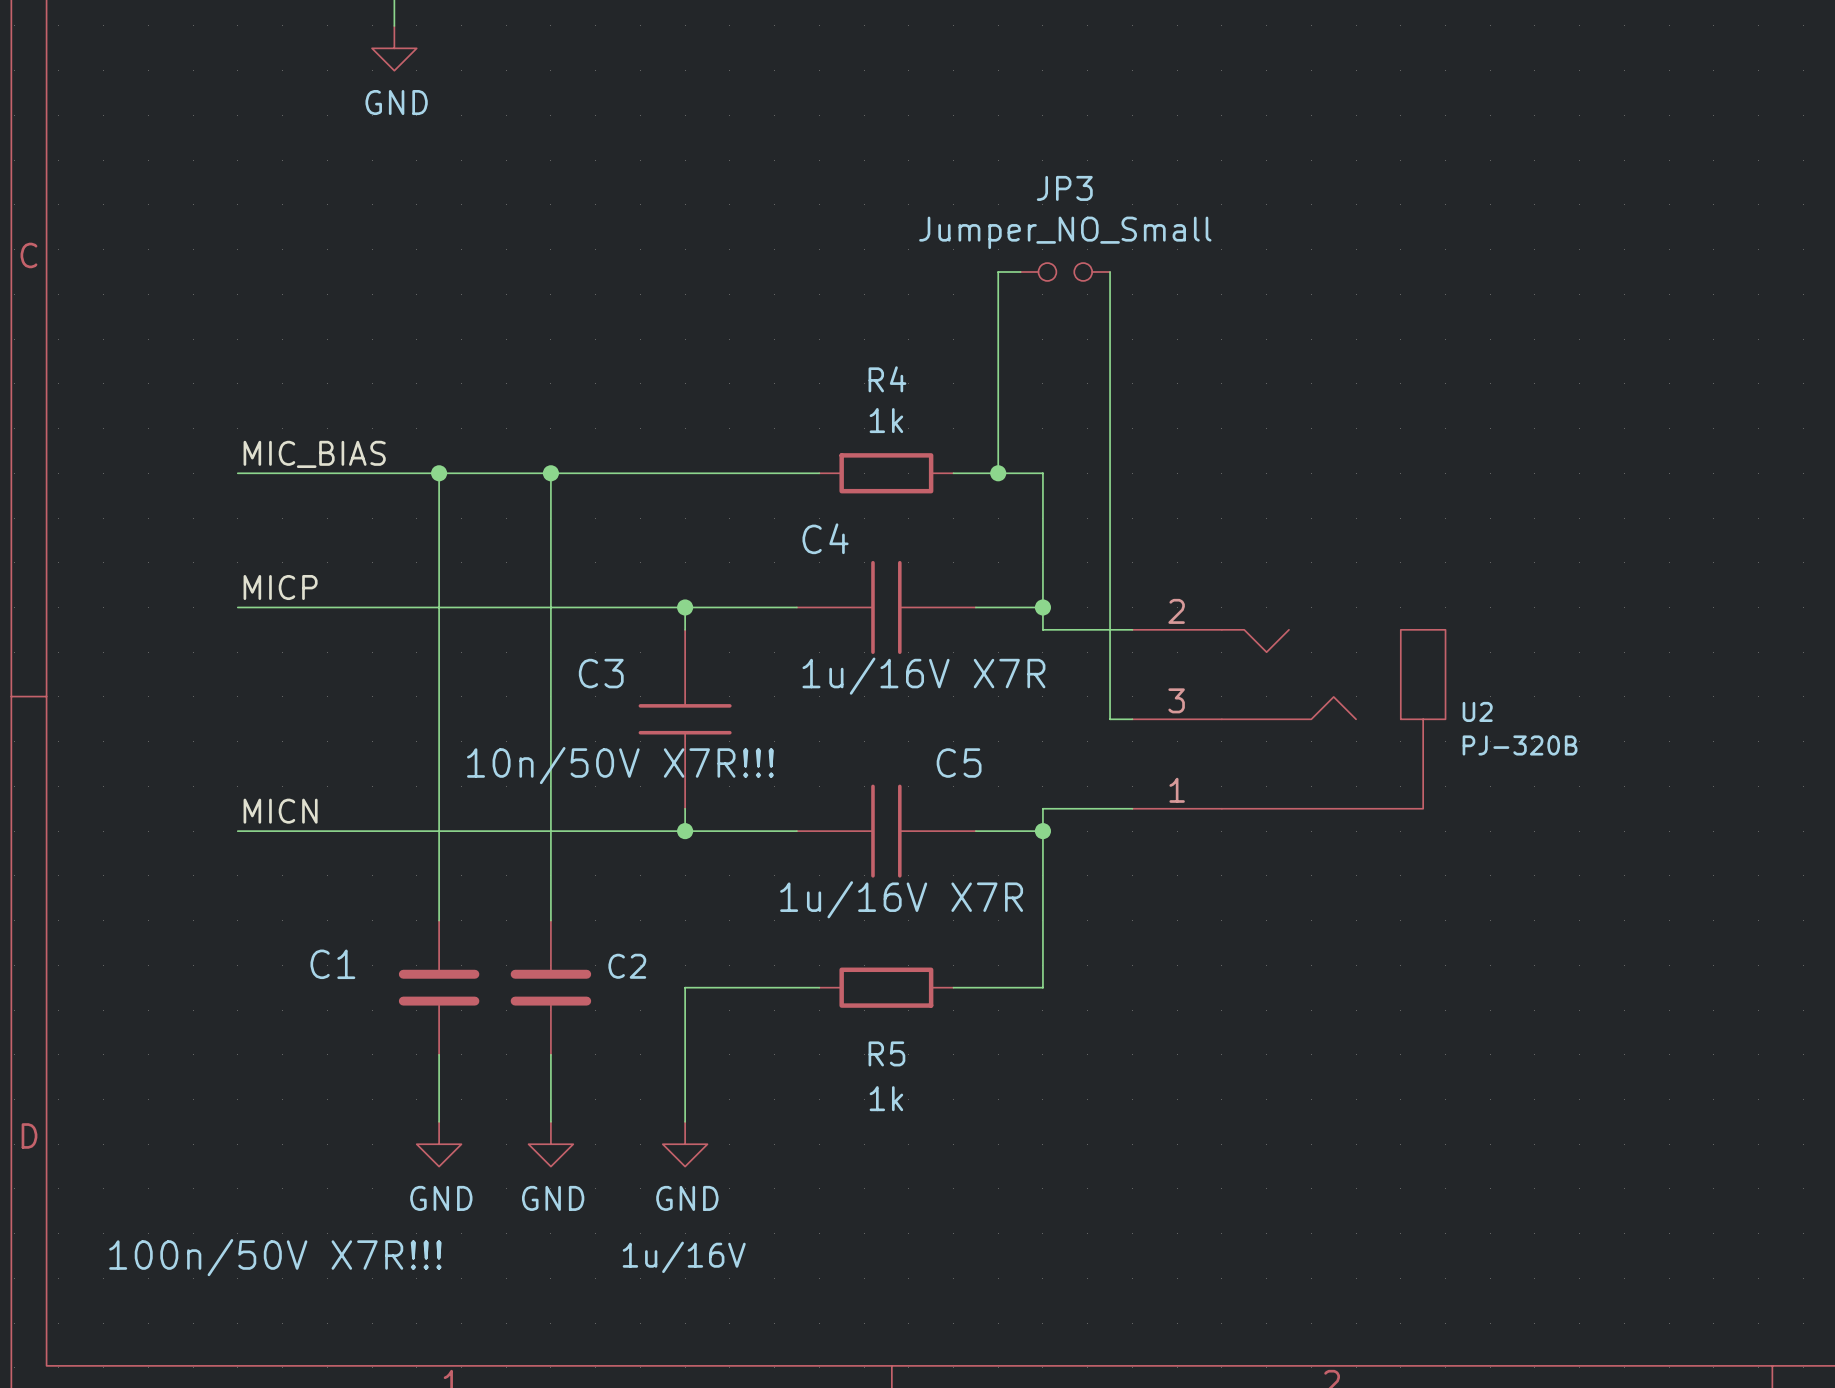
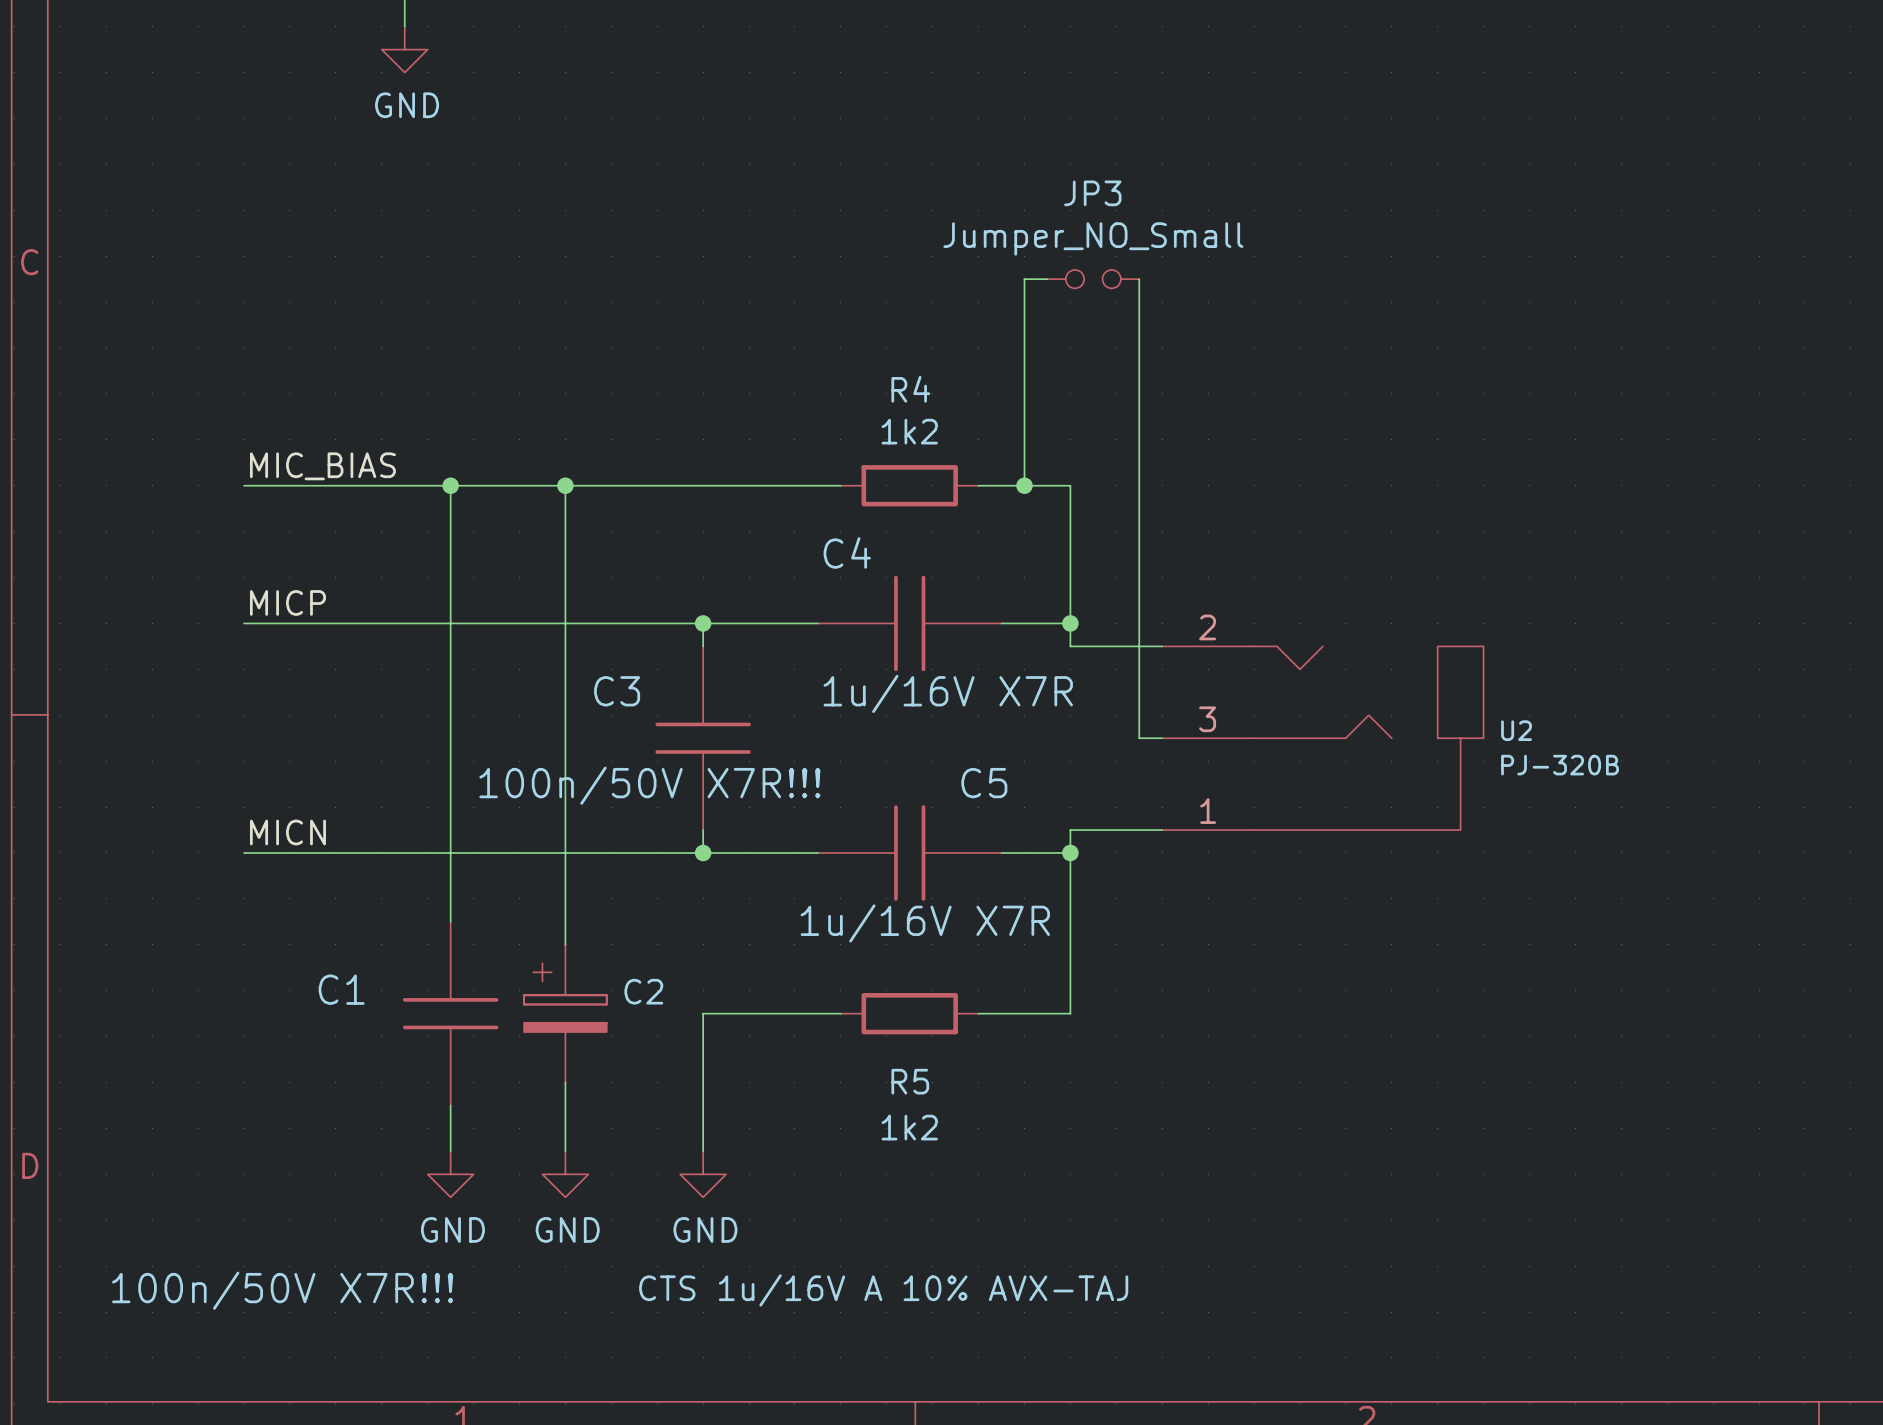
R4 value: 1k (886, 420) -> 1k2 (909, 431)
C3 value: 10n/50V X7R!!! (620, 765) -> 100n/50V X7R!!! (649, 785)
C1 symbol: [398, 920, 480, 1055] -> [402, 921, 499, 1106]
C2 symbol: [510, 920, 592, 1055] -> [524, 944, 607, 1083]
R5 value: 1k (886, 1098) -> 1k2 (909, 1127)
C2 value: 1u/16V (684, 1257) -> CTS 1u/16V A 10% AVX-TAJ (883, 1290)

